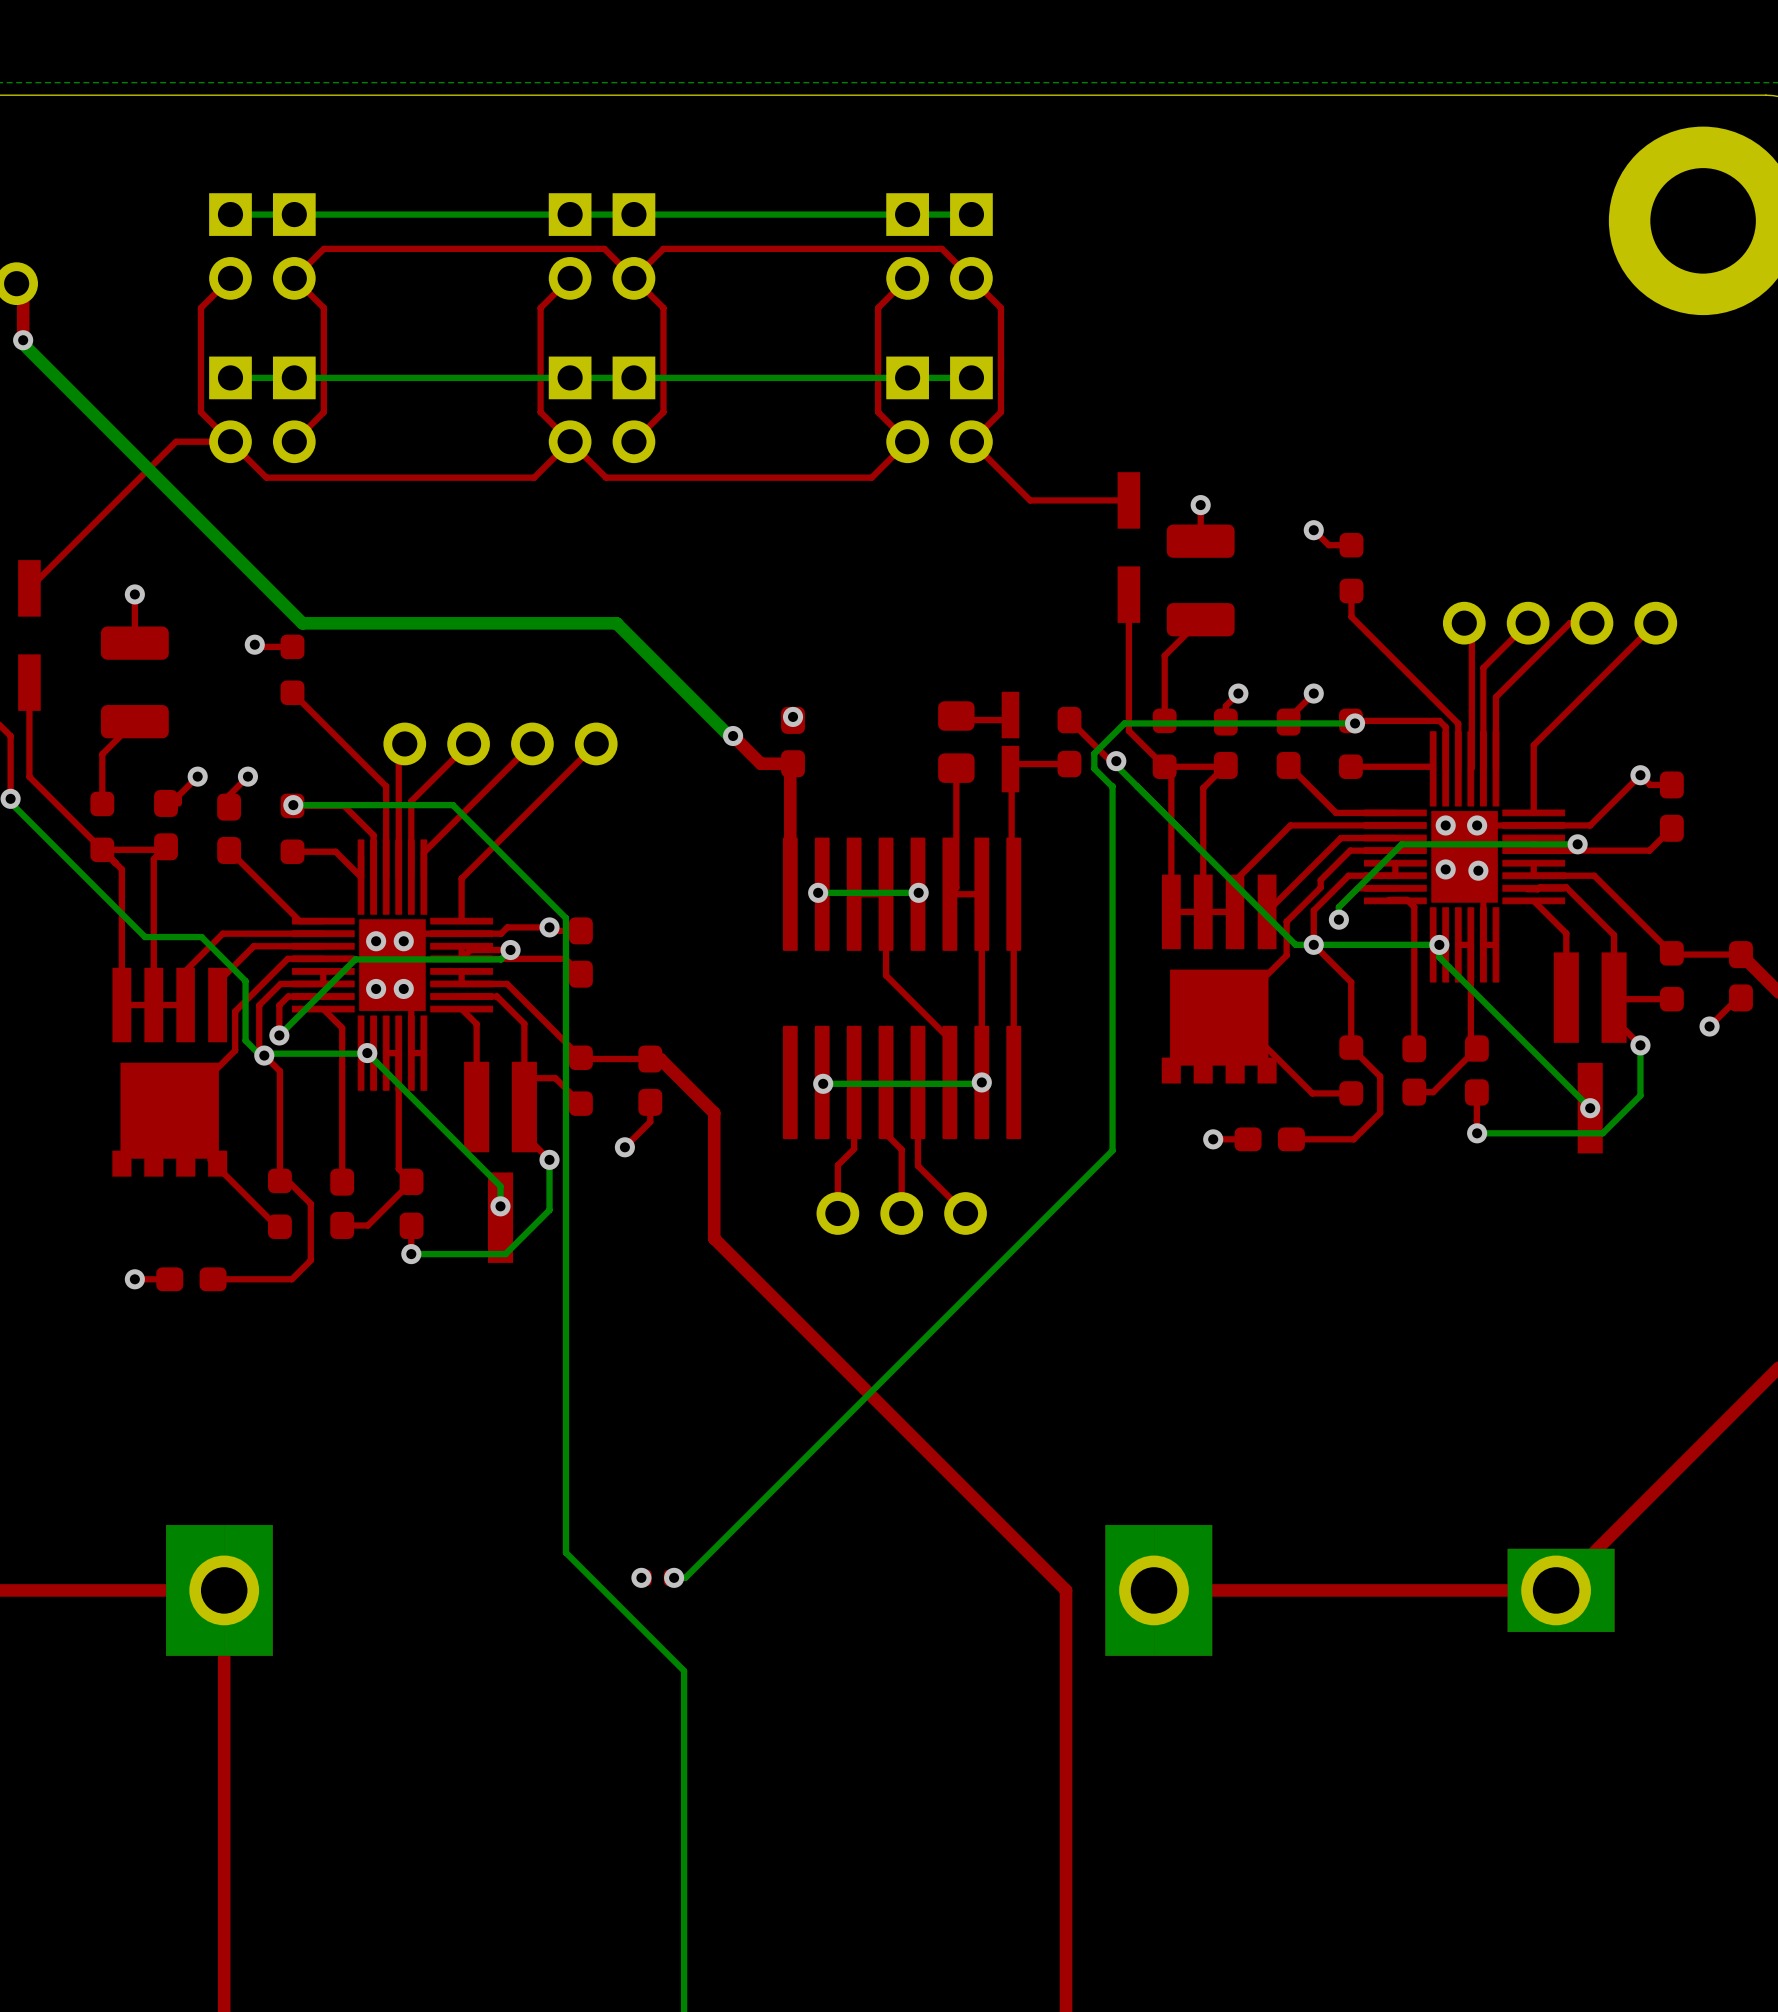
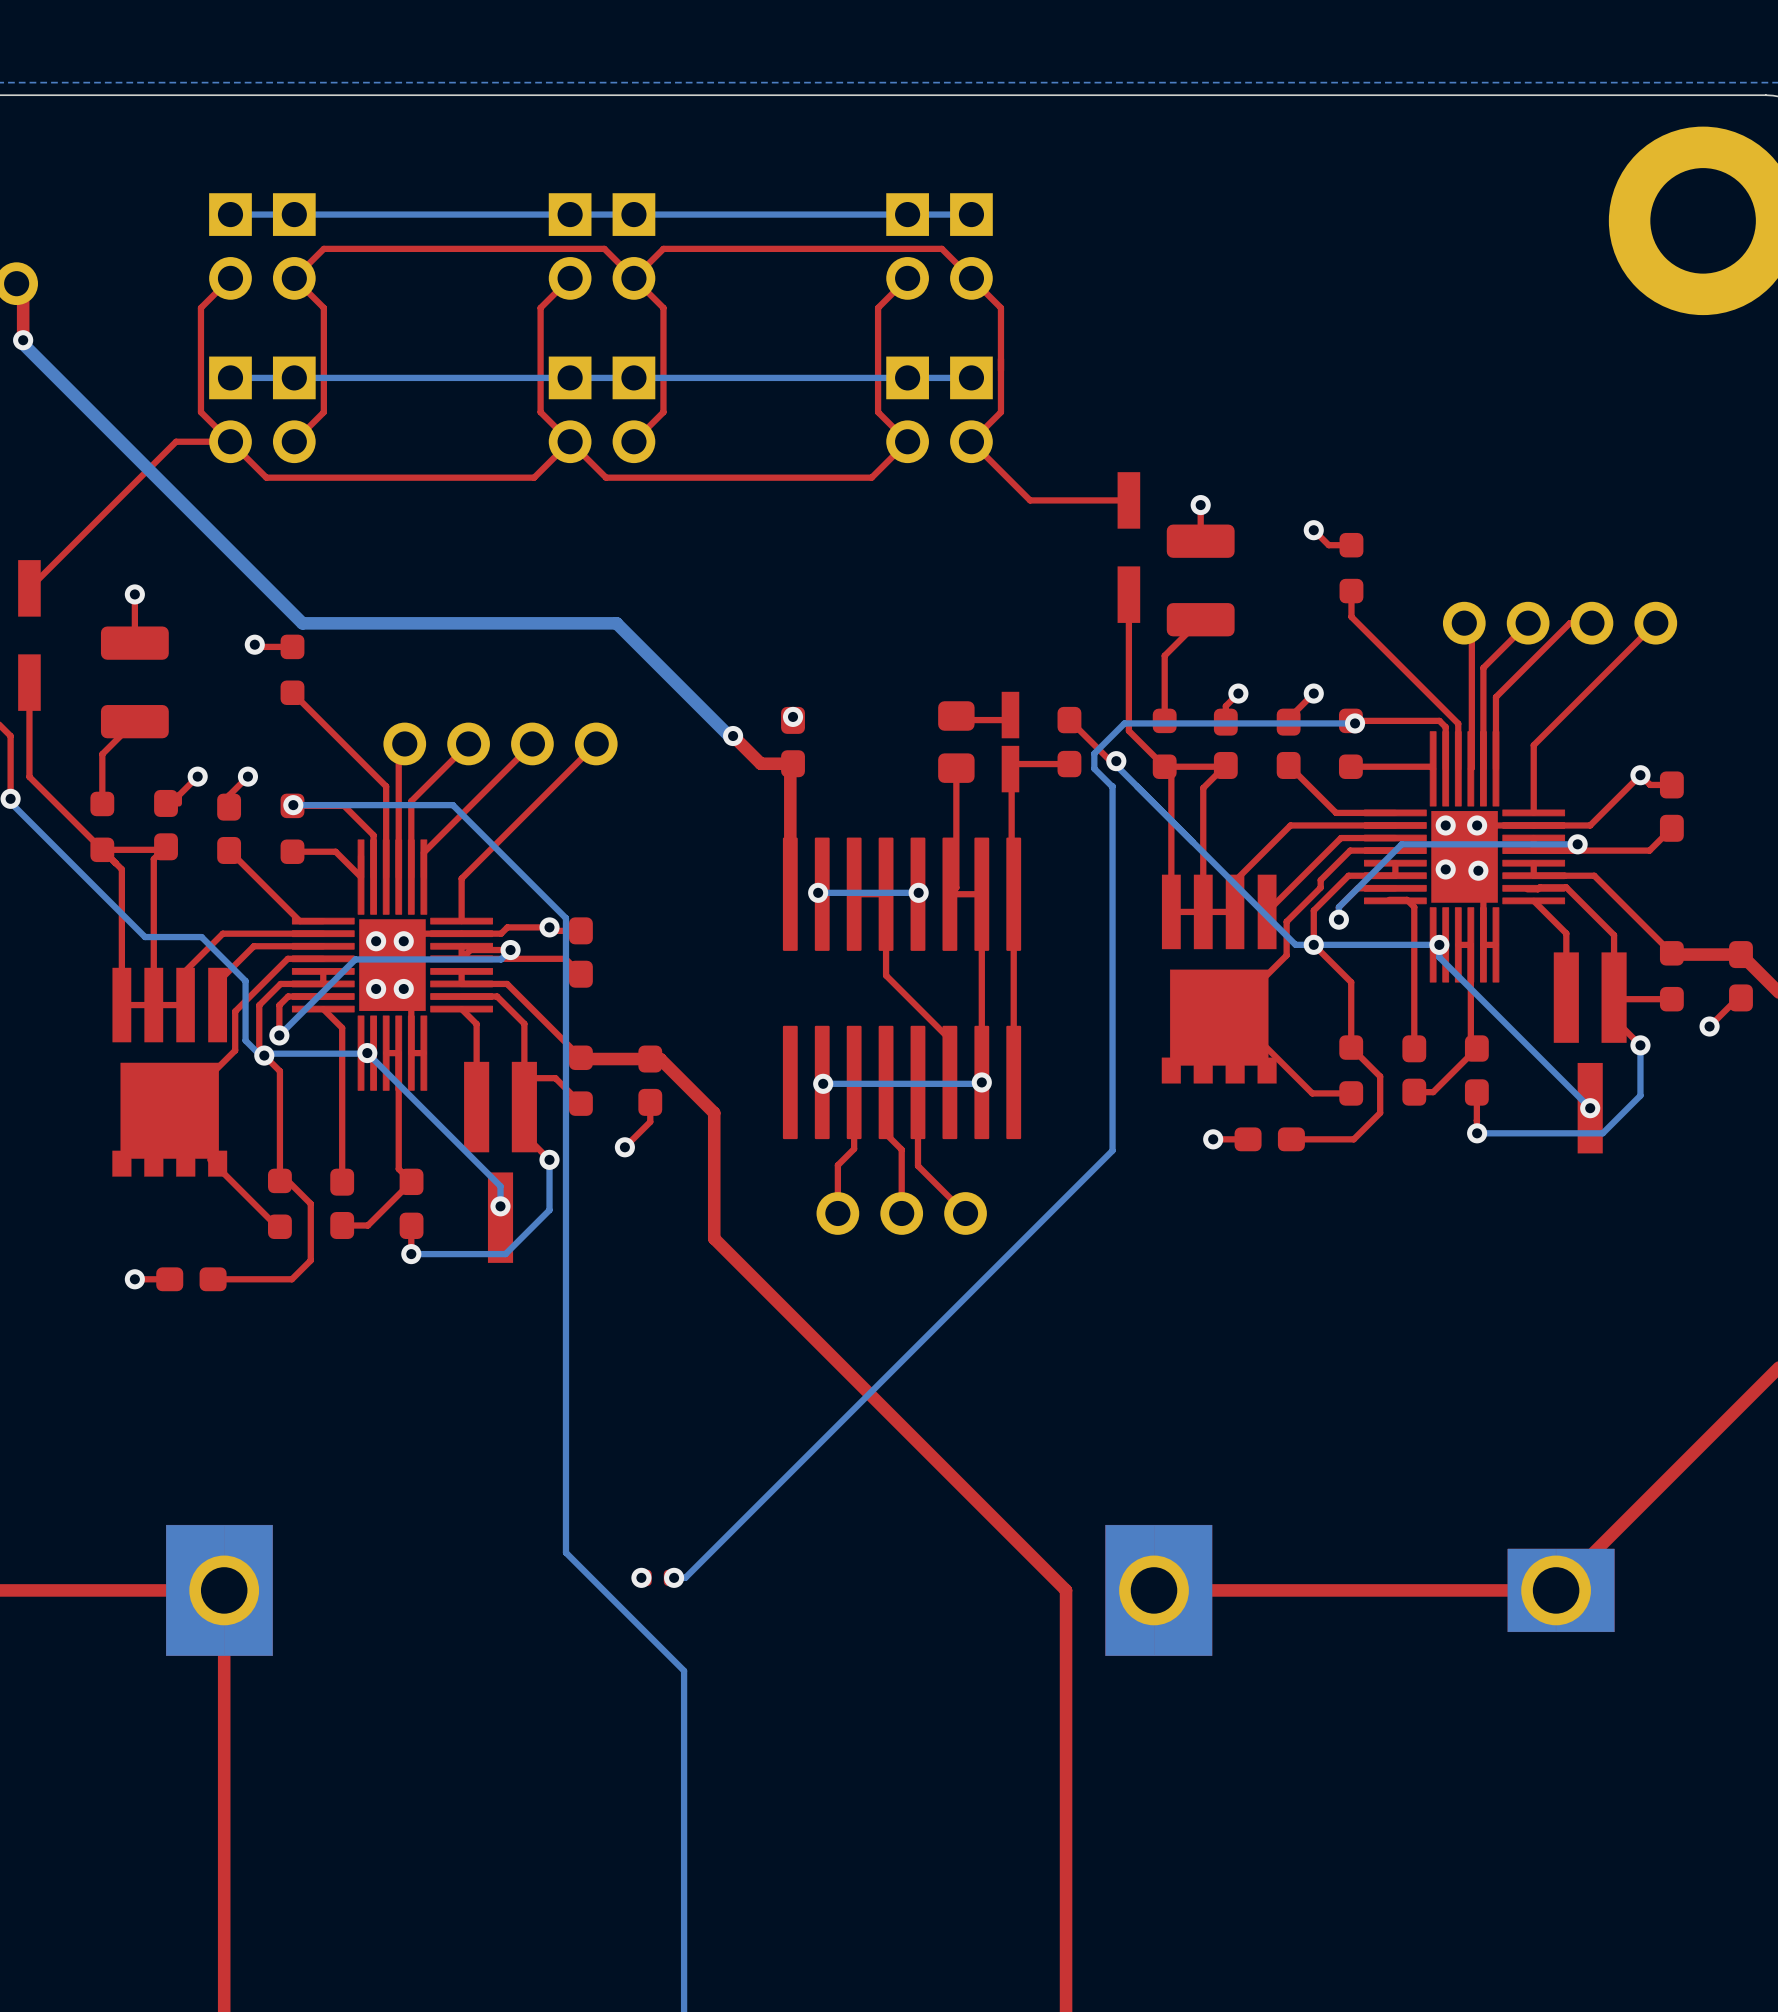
top track width: thin (1740, 954) (1673, 954) -> thick (1740, 954) (1673, 954)
top track width: thin (650, 1059) (582, 1059) -> thick (650, 1059) (582, 1059)

